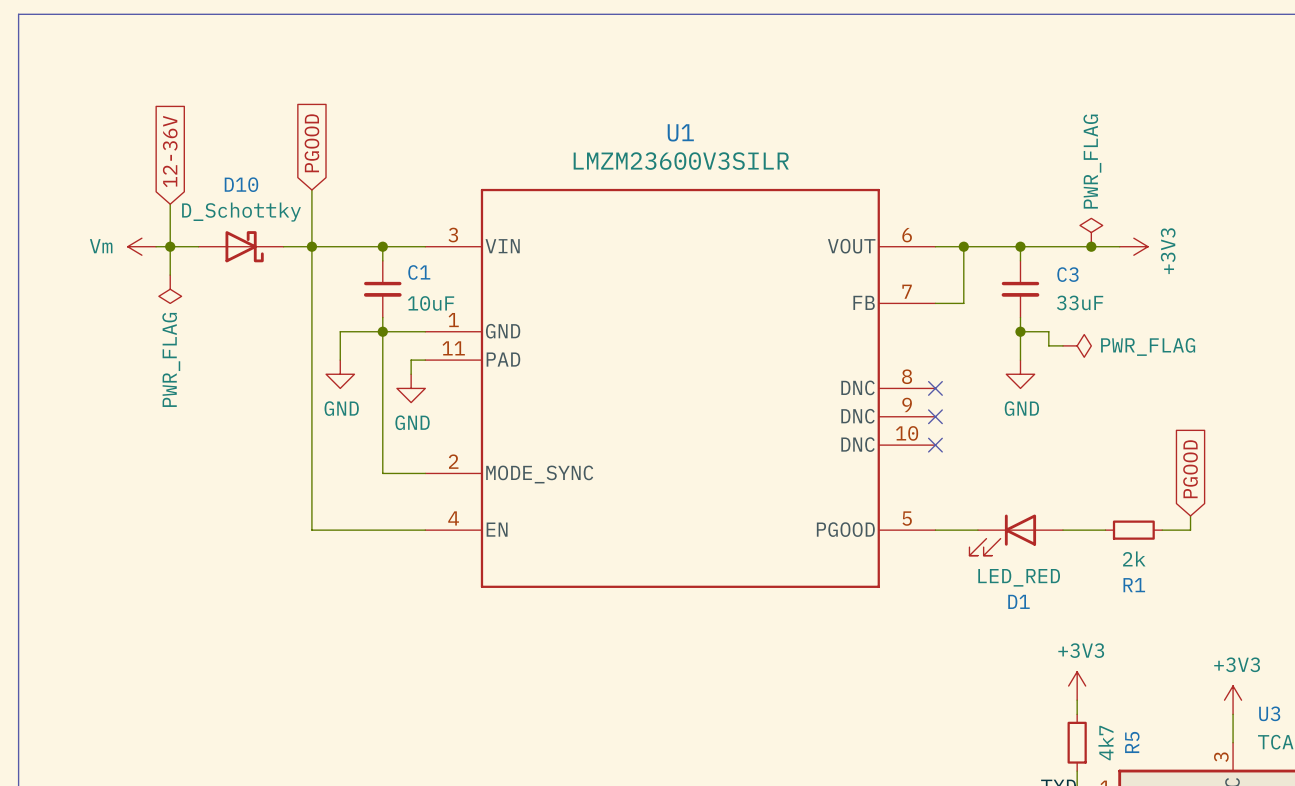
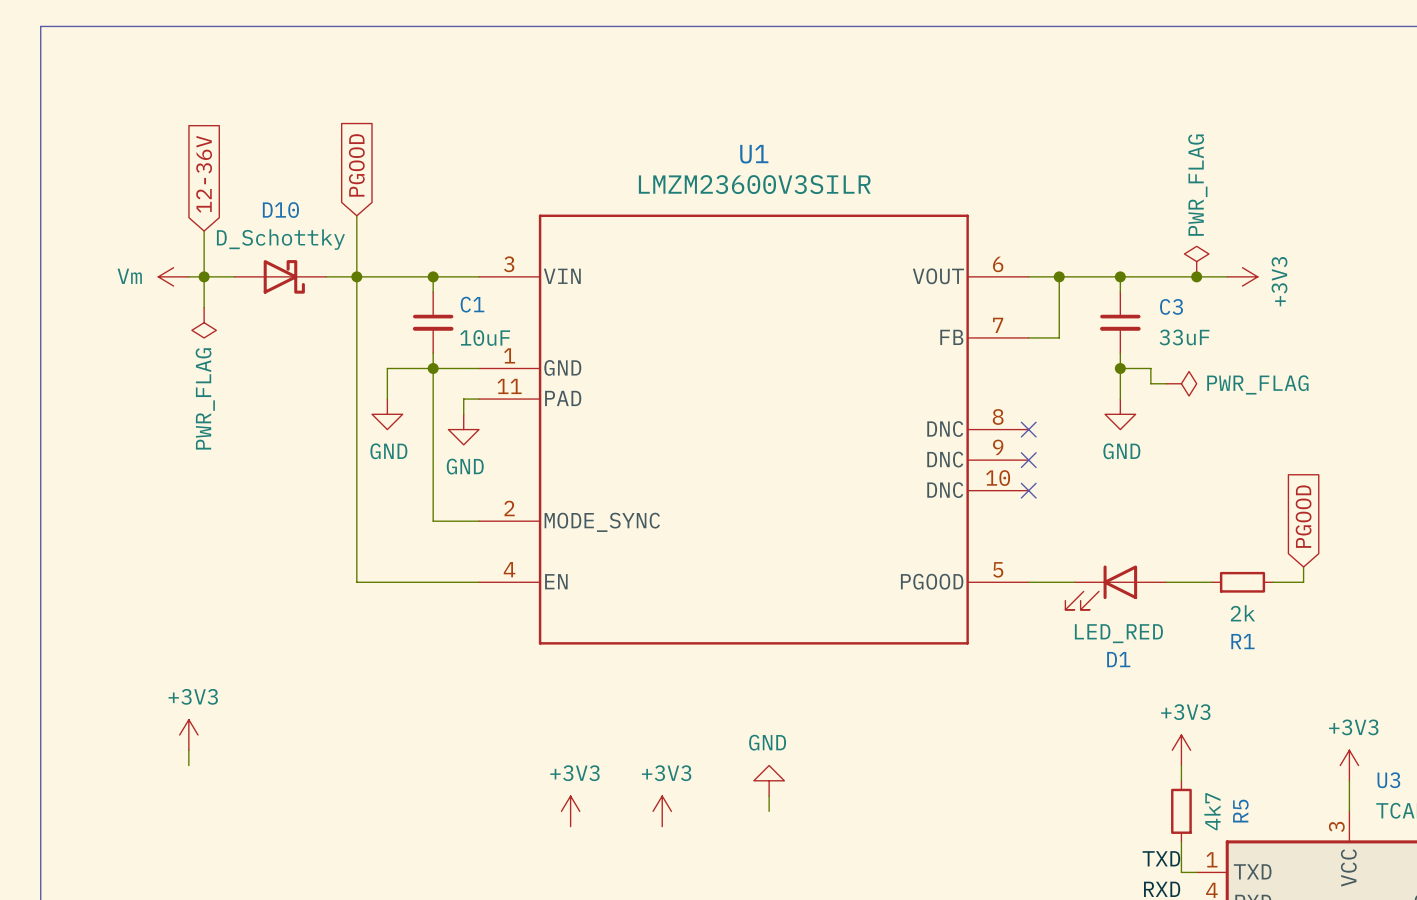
power symbol: none -> +3V3 (188, 734)
wire: none -> (188, 750) (188, 765)
power symbol: none -> GND (769, 780)
wire: none -> (769, 796) (769, 811)
power symbol: none -> +3V3 (570, 811)
power symbol: none -> +3V3 (662, 811)

